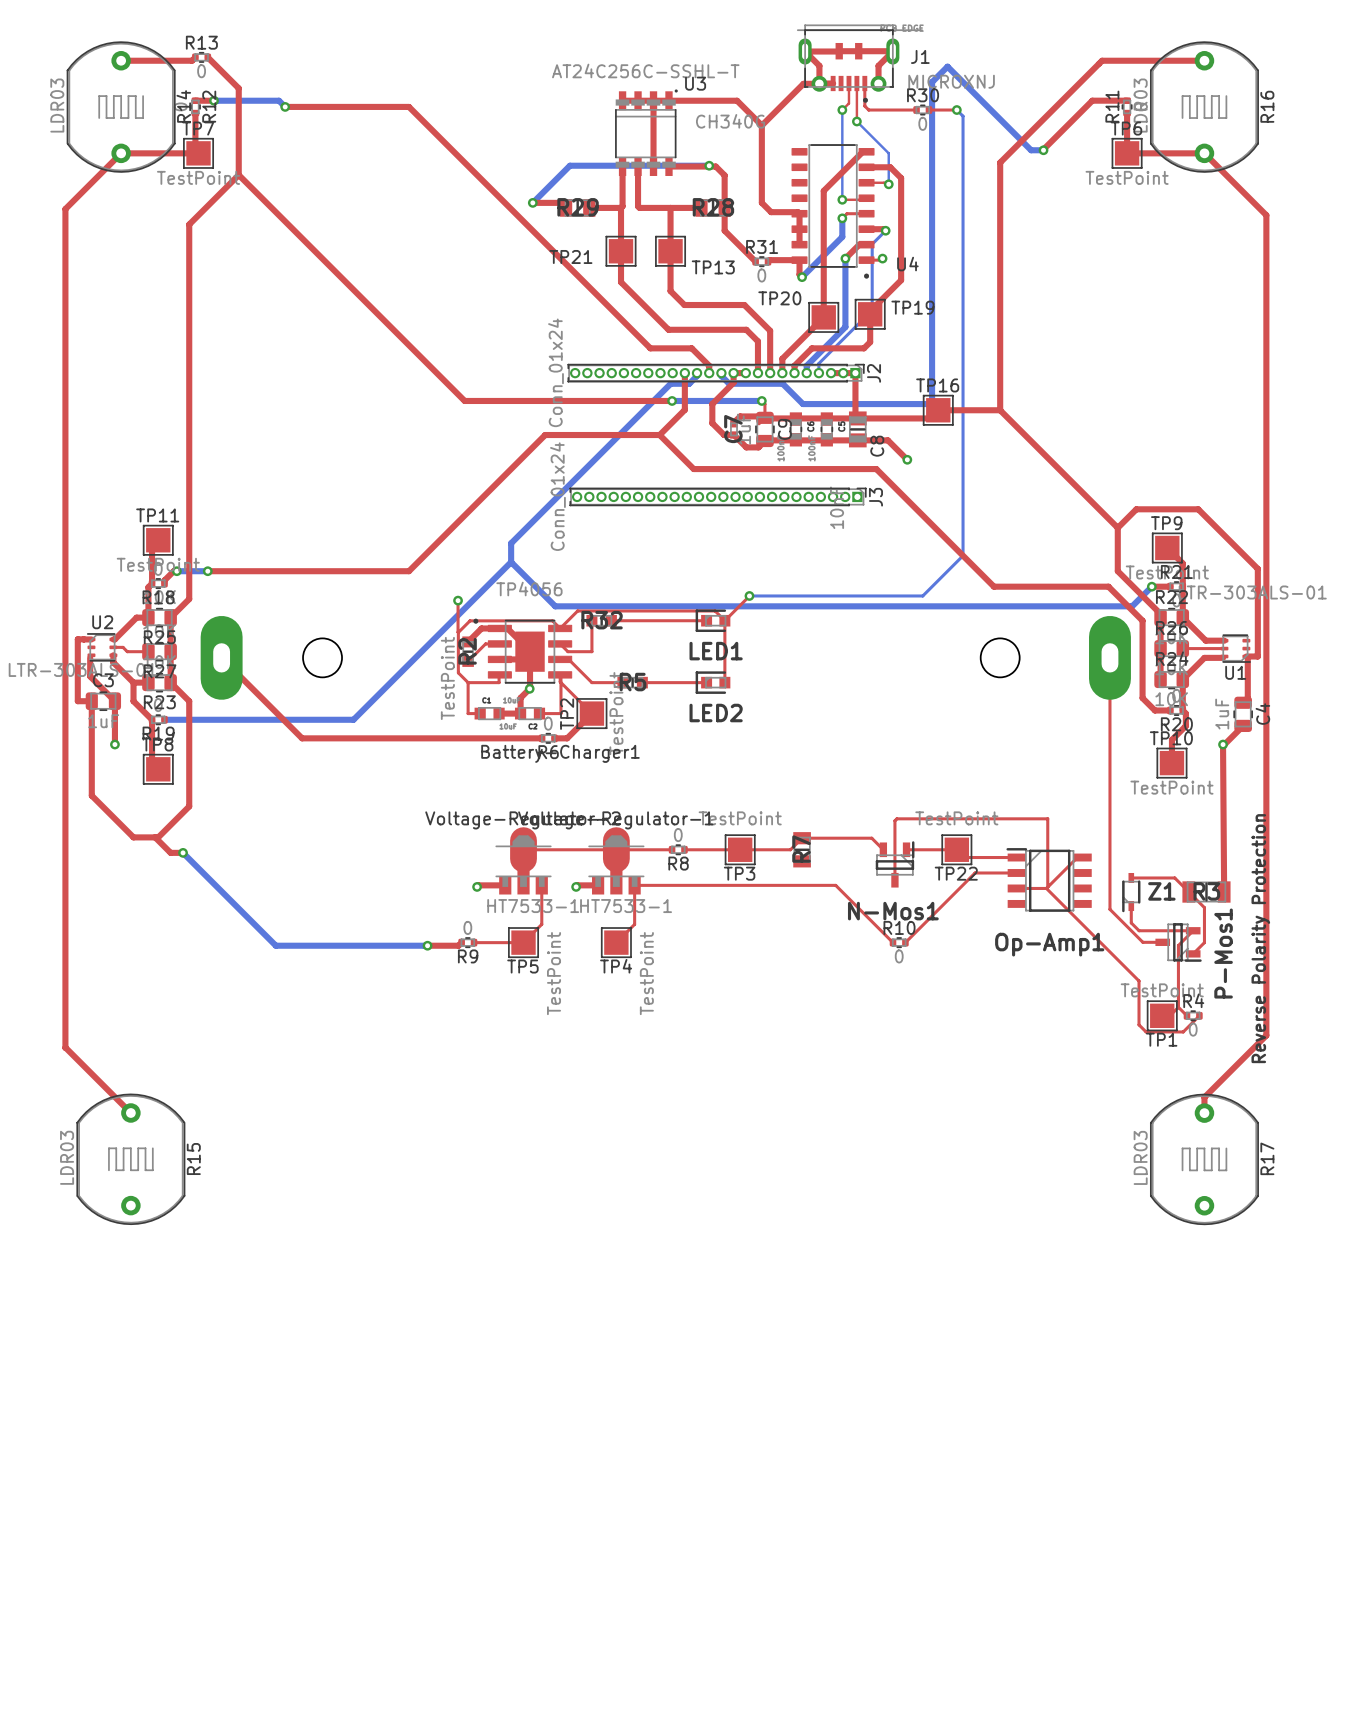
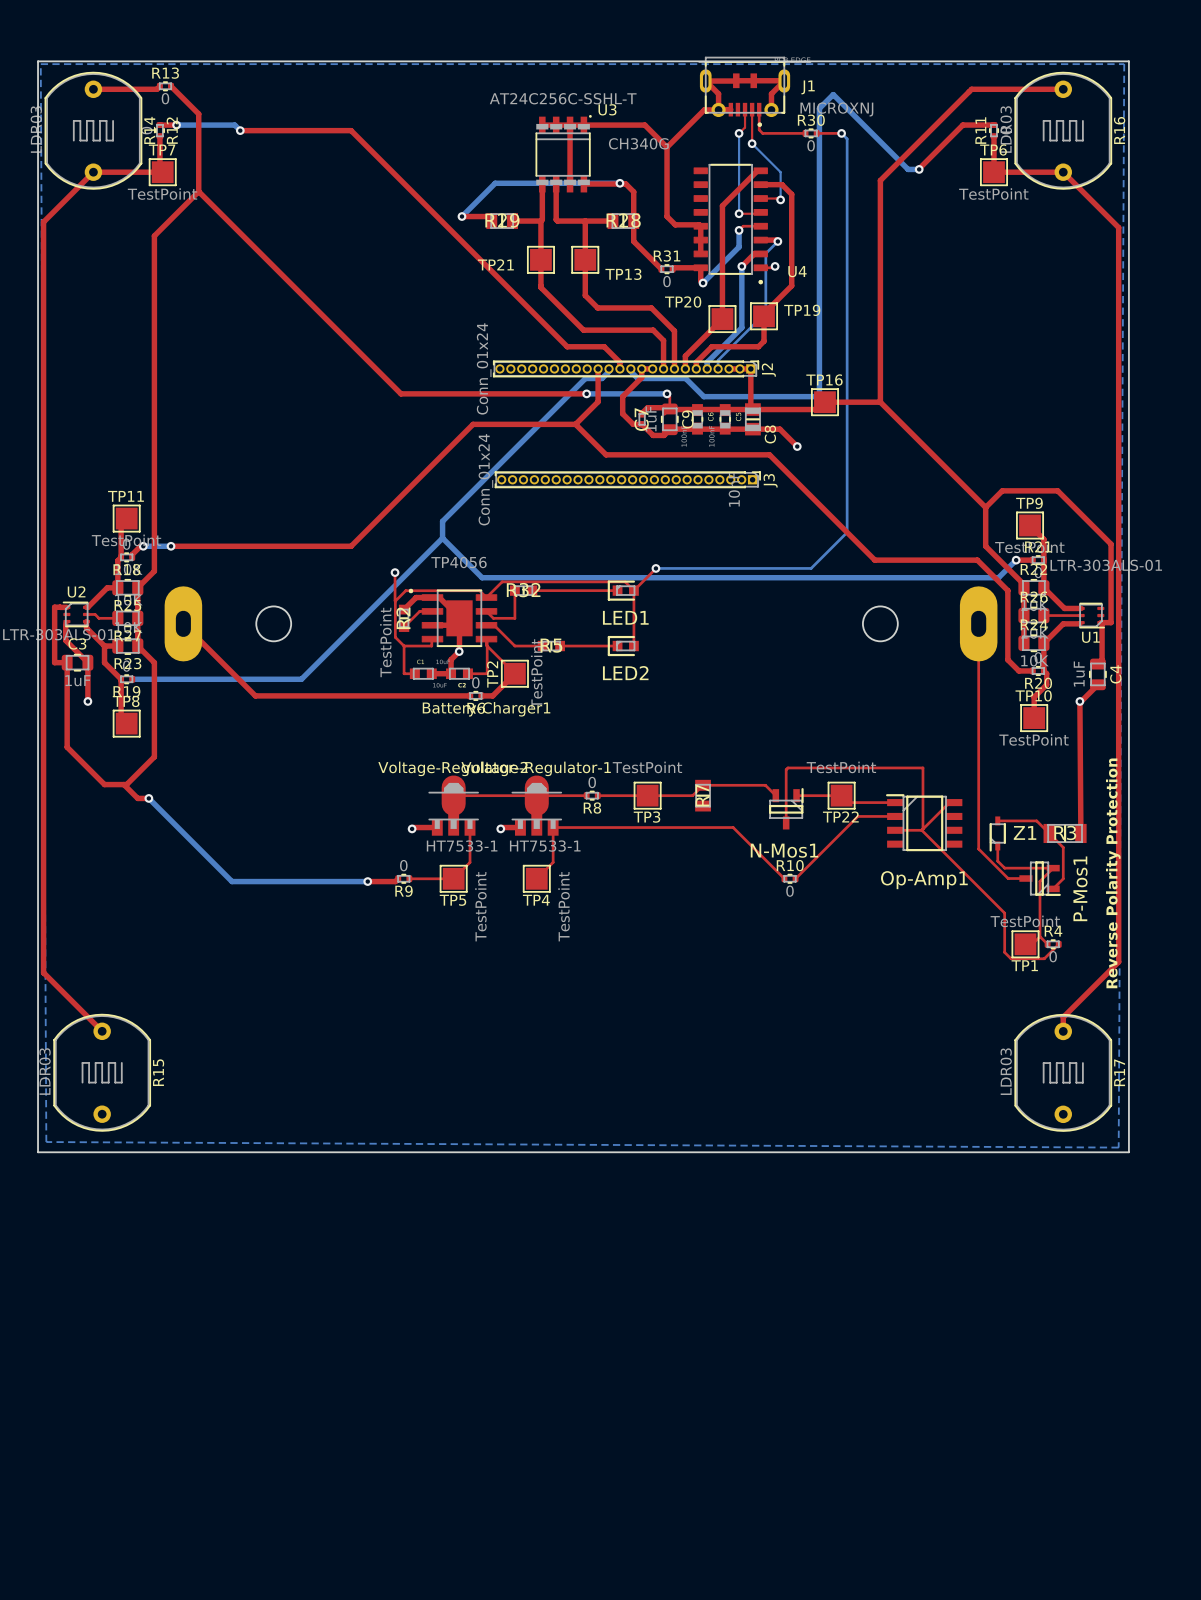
board edge: none -> (38, 61) (38, 1152) (1128, 1152) (1128, 61) (38, 61)
bottom zone outline: none -> (40, 64) (1124, 64) (1118, 1147) (46, 1142) (40, 64)

